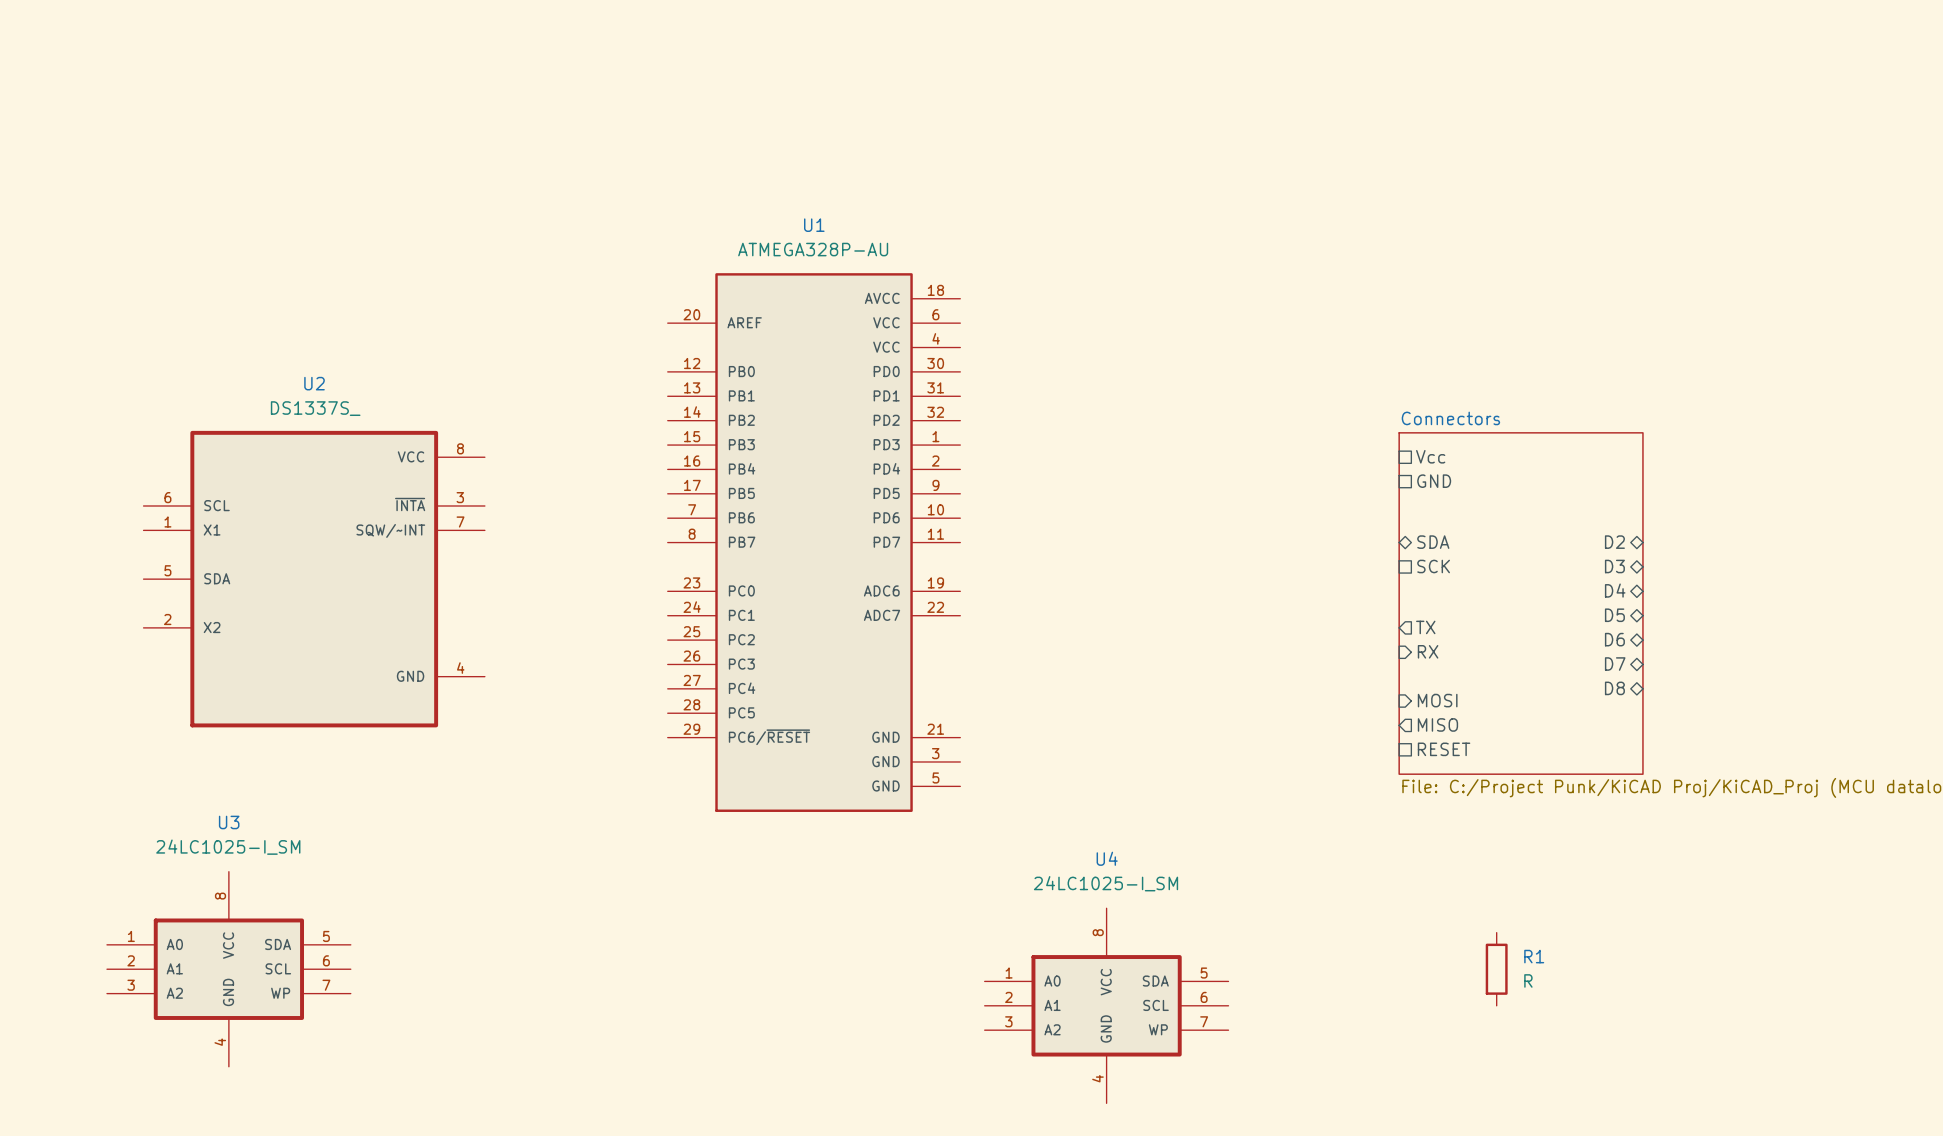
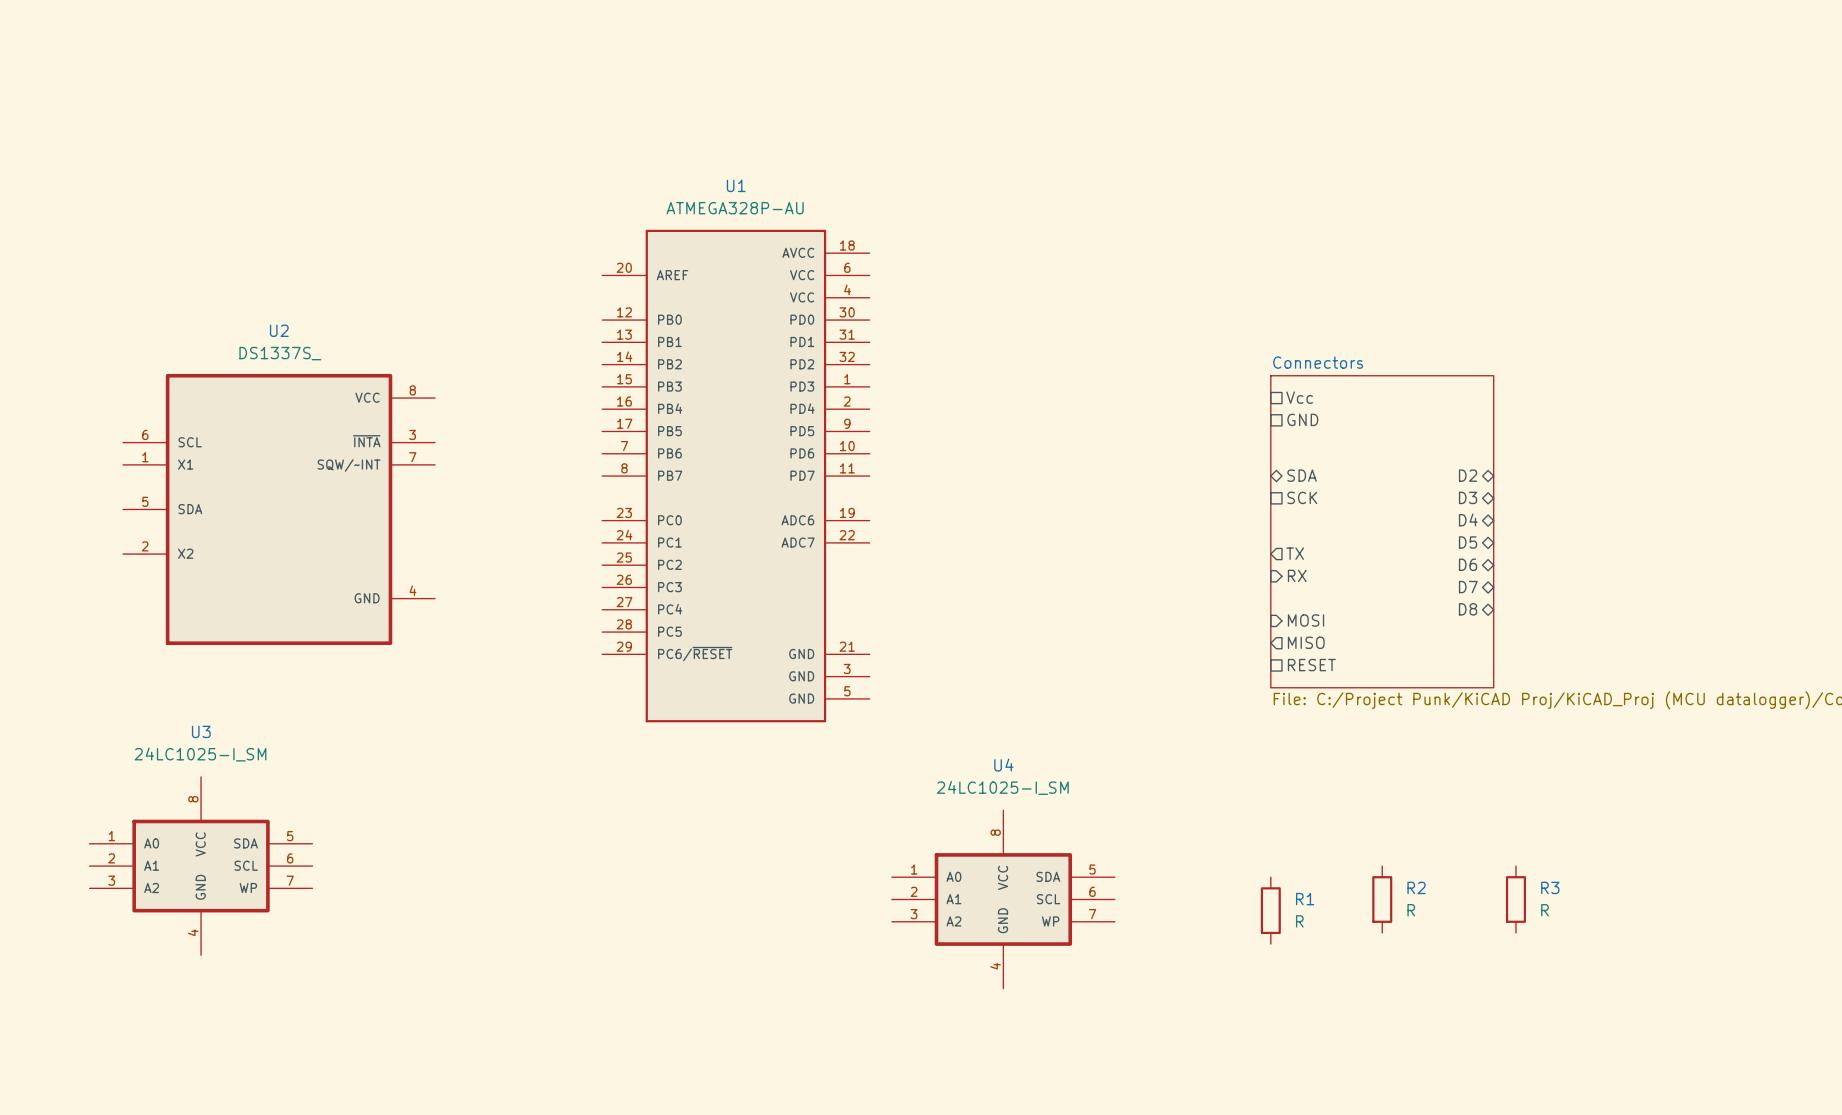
R1 position: (1496, 969) -> (1270, 910)
R2: none -> R (1382, 899)
R3: none -> R (1515, 899)

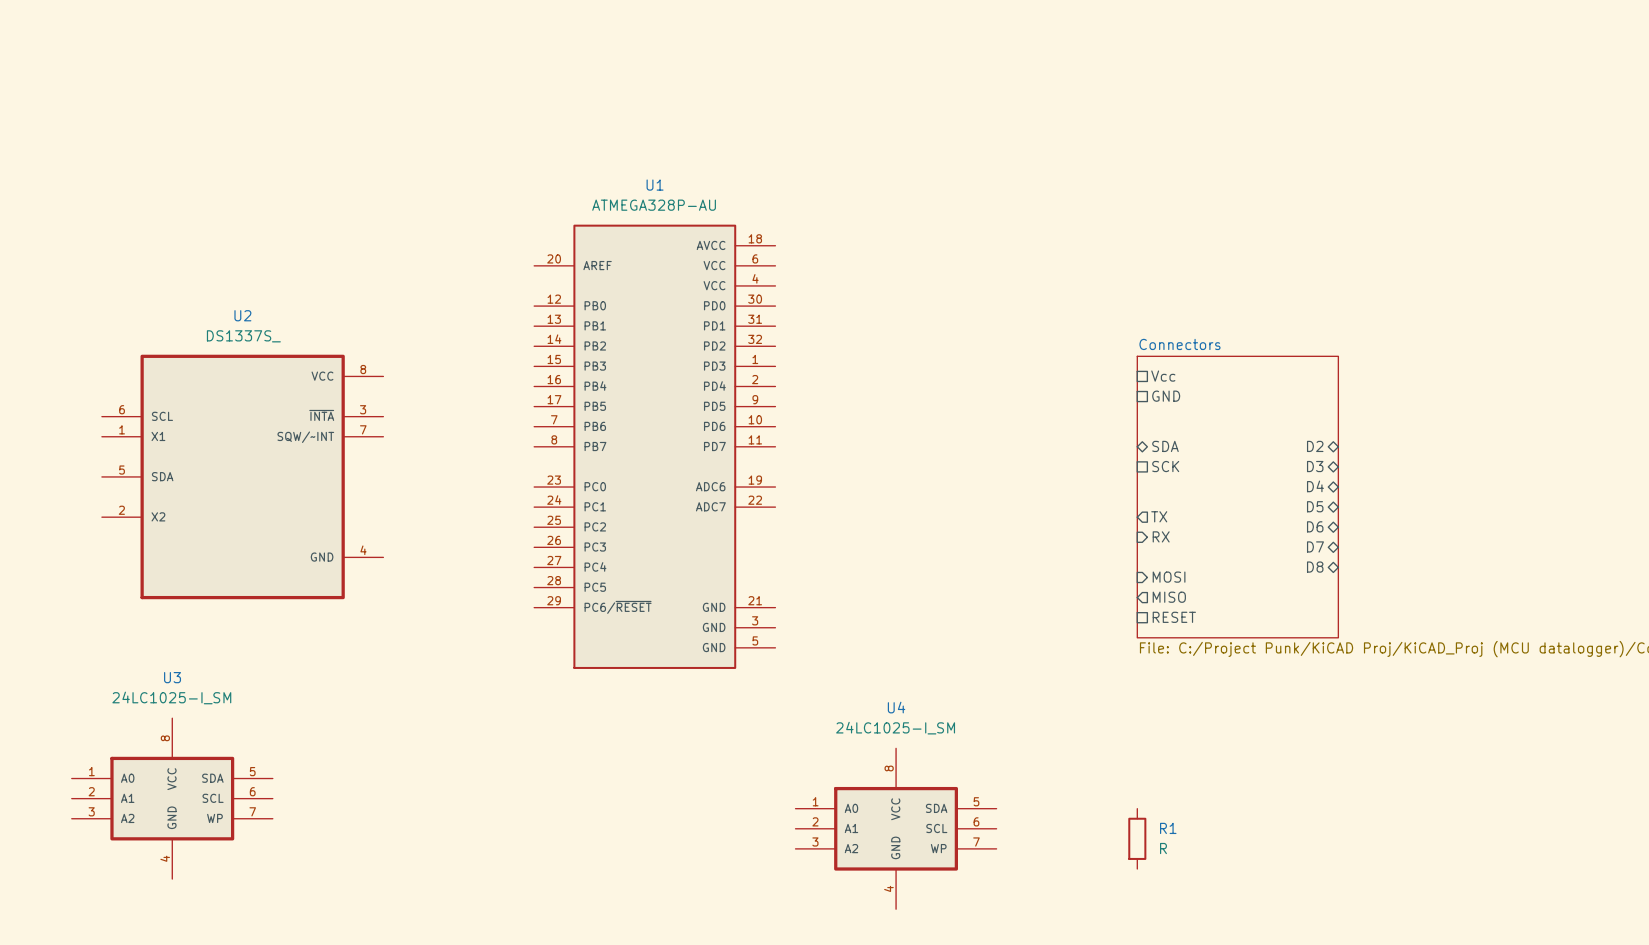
R2: R (1382, 899) -> none
R3: R (1515, 899) -> none

